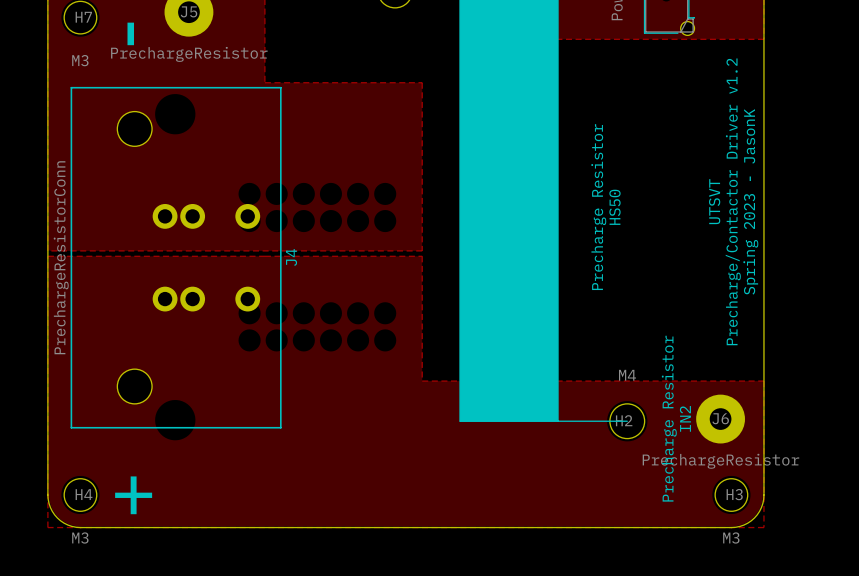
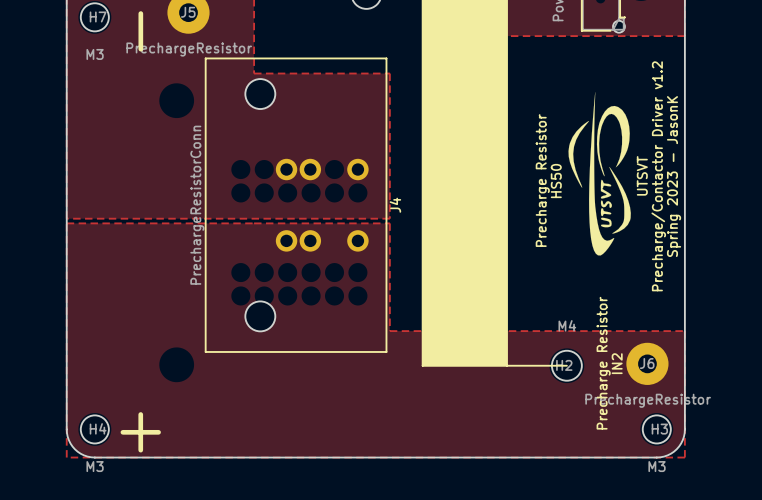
drawing: none -> [568, 91, 631, 256]
J4 position: (176, 257) -> (296, 205)

